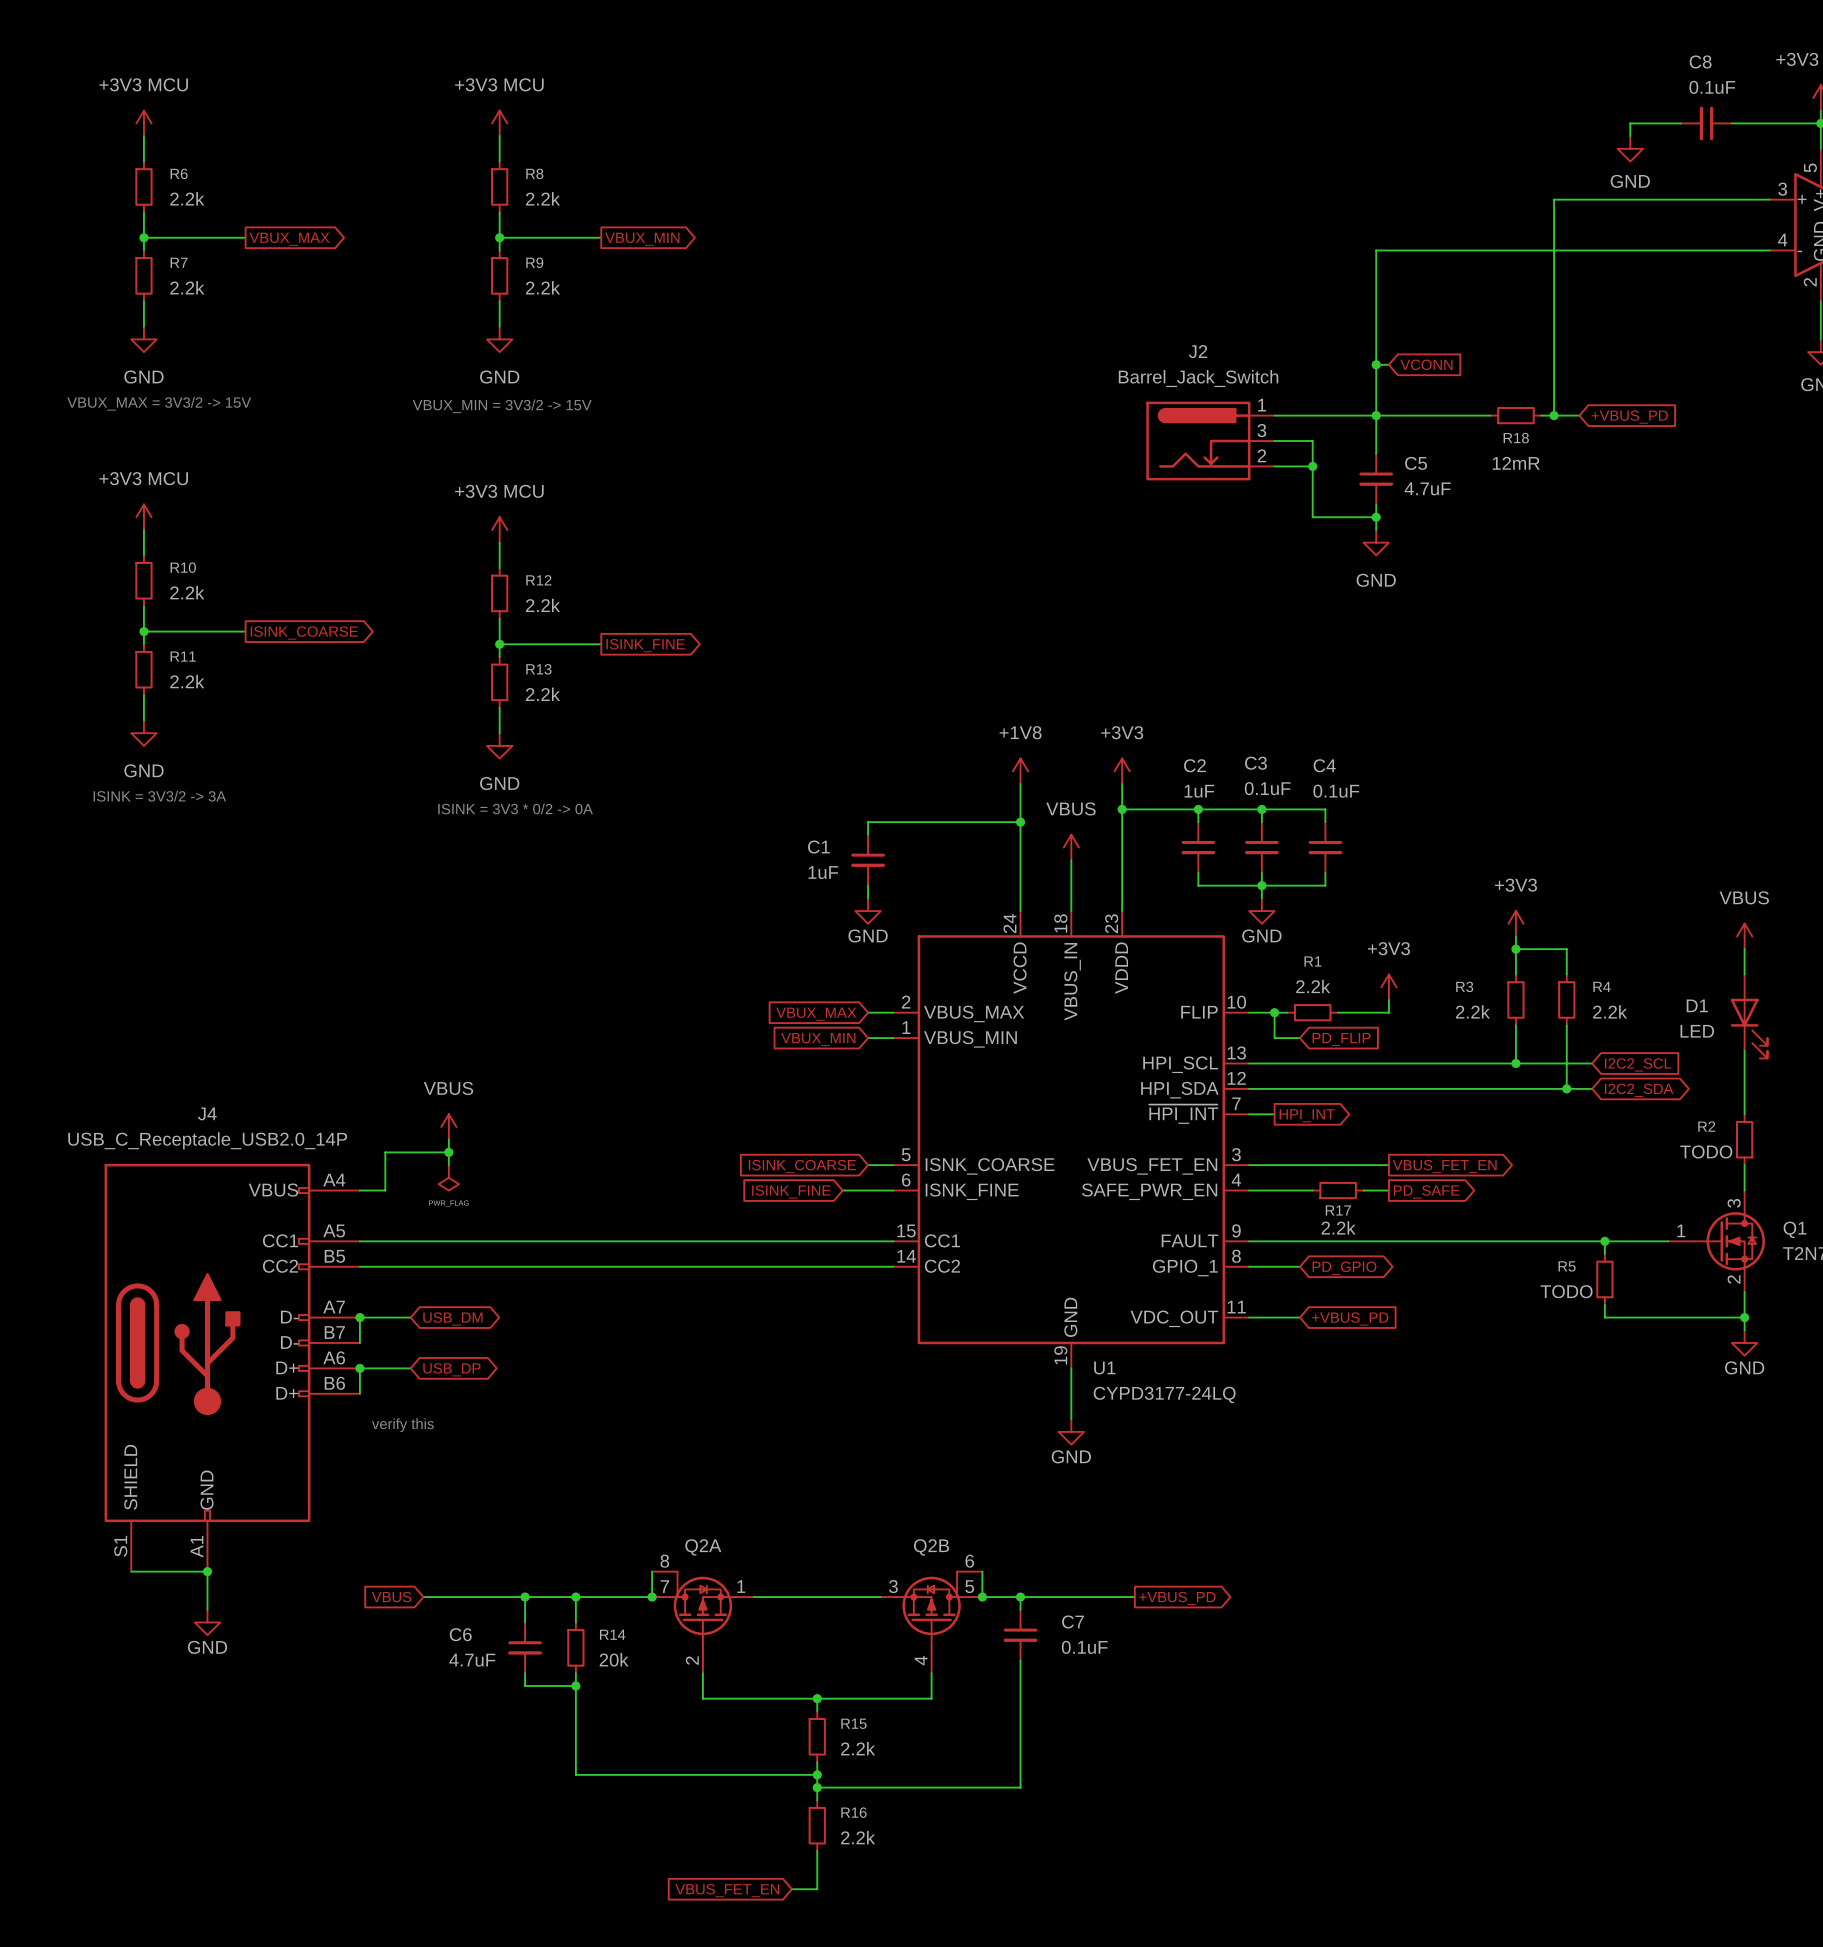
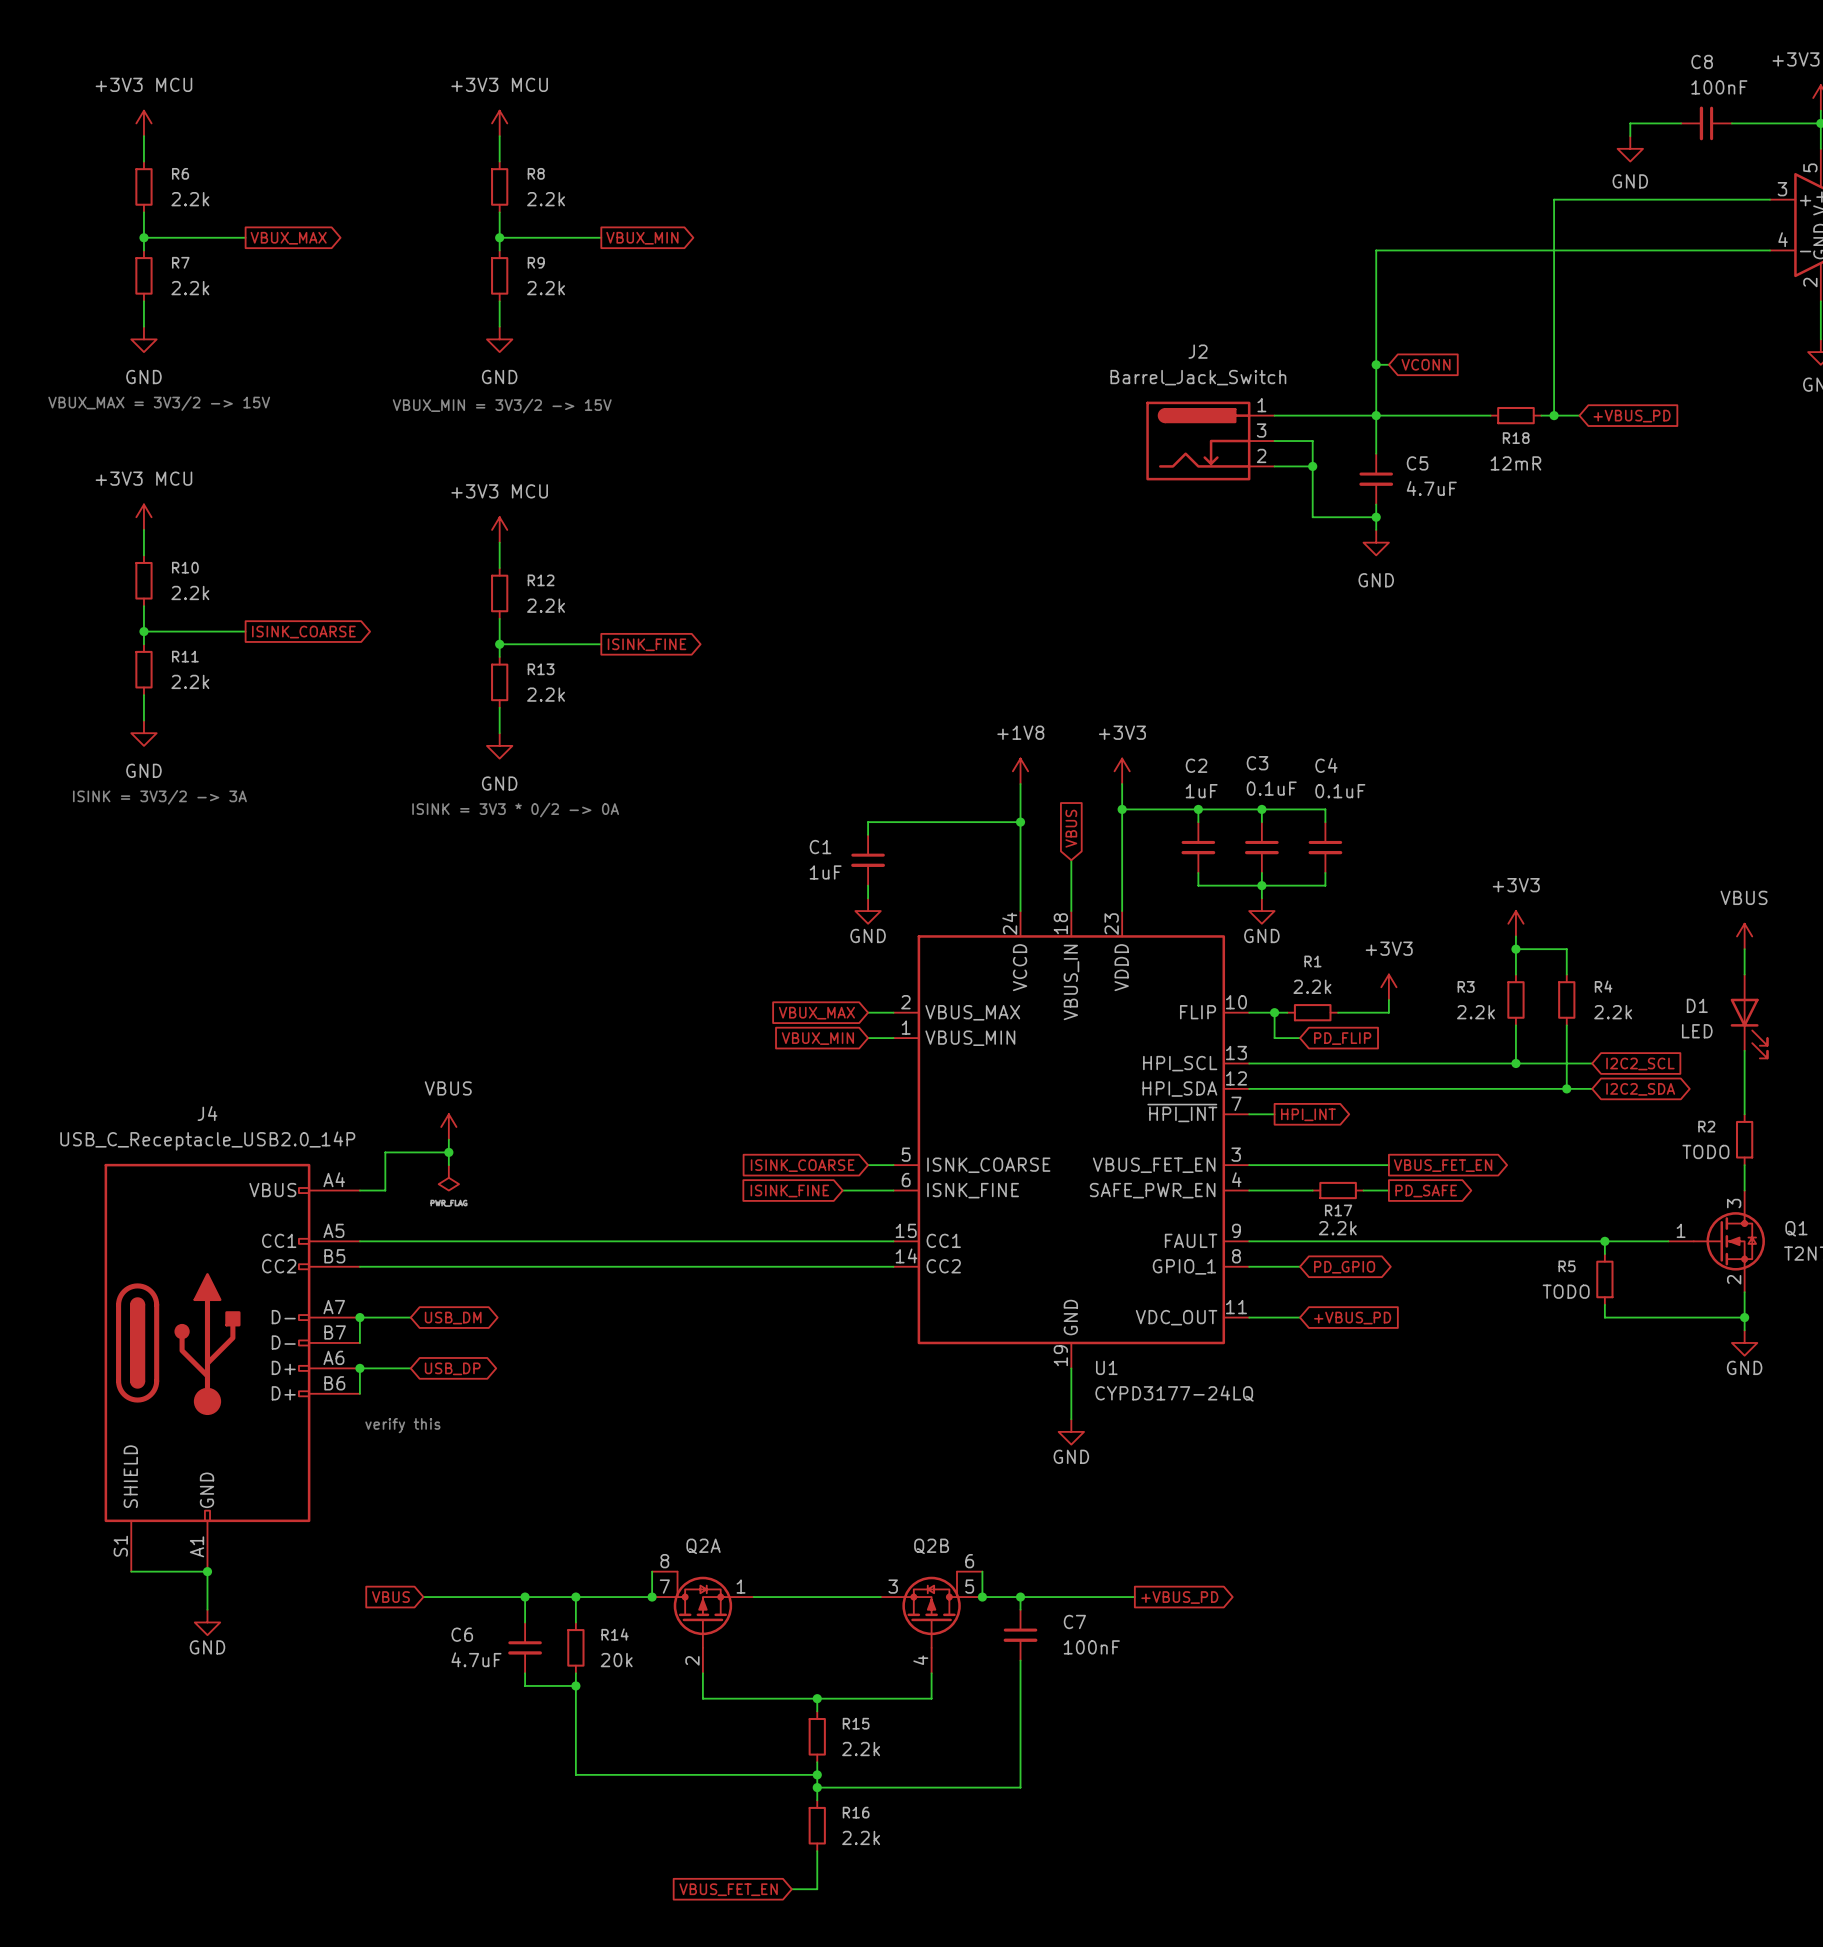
C8 value: 0.1uF (1712, 87) -> 100nF (1719, 87)
global label: none -> VBUS (1071, 828)
power symbol: VBUS (1071, 847) -> none
C7 value: 0.1uF (1084, 1647) -> 100nF (1091, 1647)

